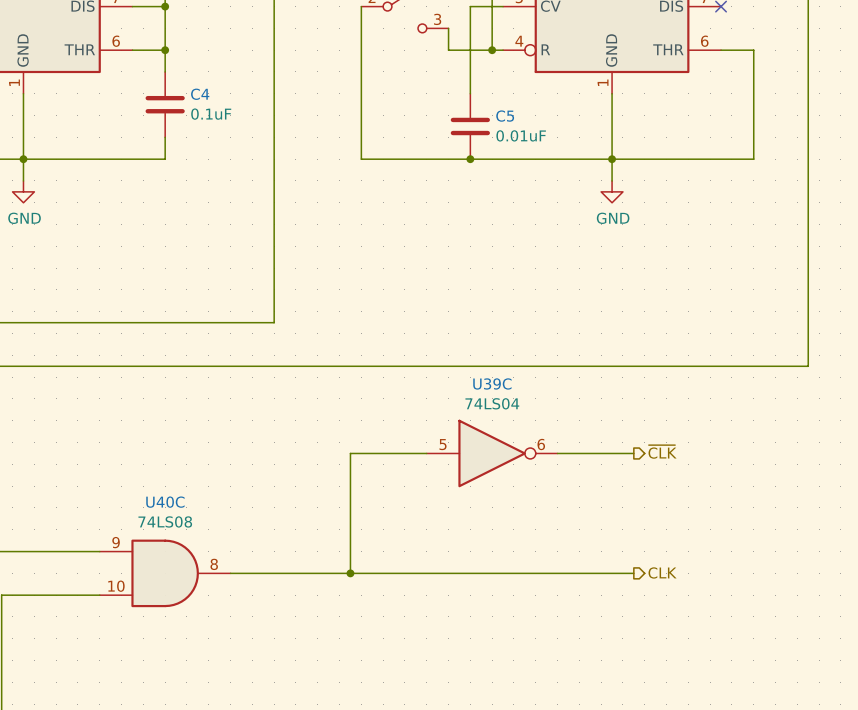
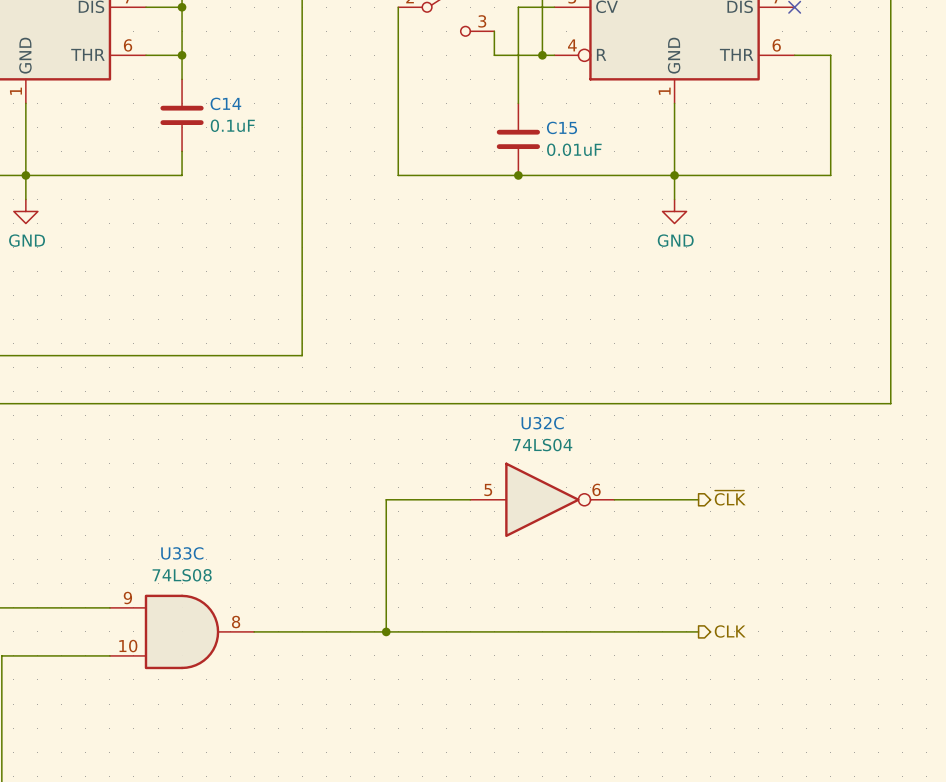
C4 name: C4 (200, 94) -> C14 (225, 103)
C5 name: C5 (505, 116) -> C15 (561, 127)
U39C name: U39C (492, 383) -> U32C (542, 423)
U40C name: U40C (165, 502) -> U33C (182, 553)

